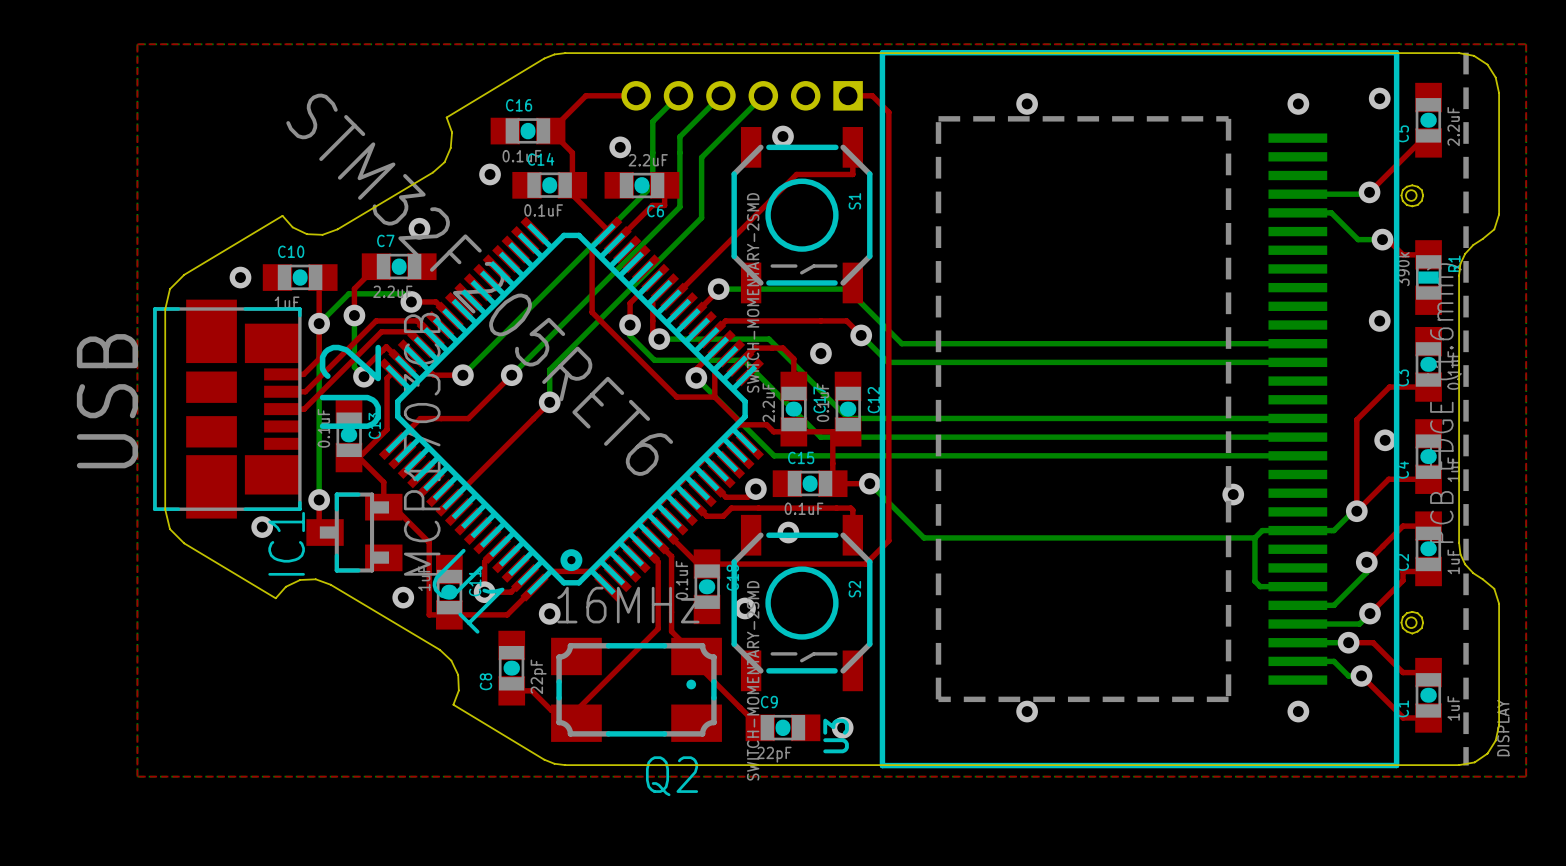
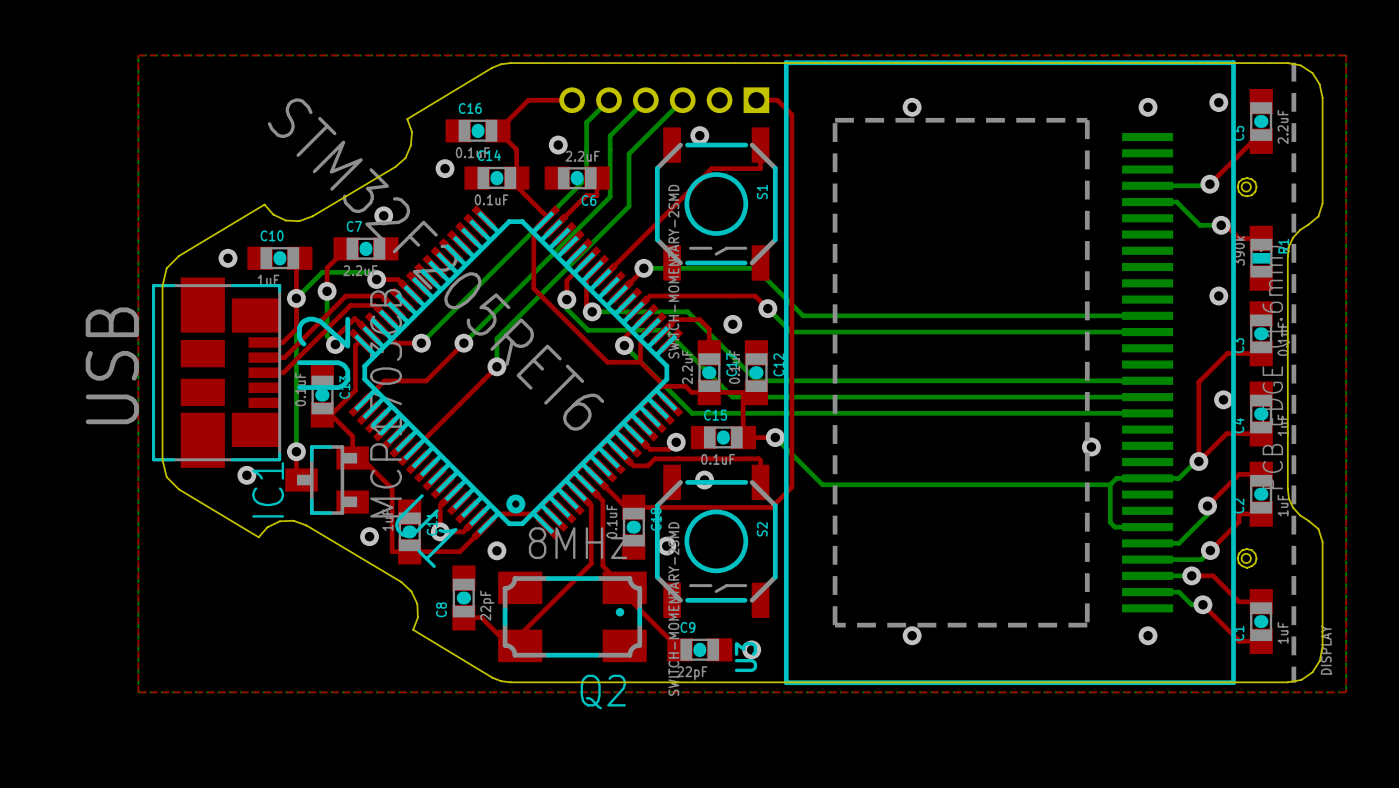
Q2 value: 16MHz (628, 605) -> 8MHz (578, 543)

